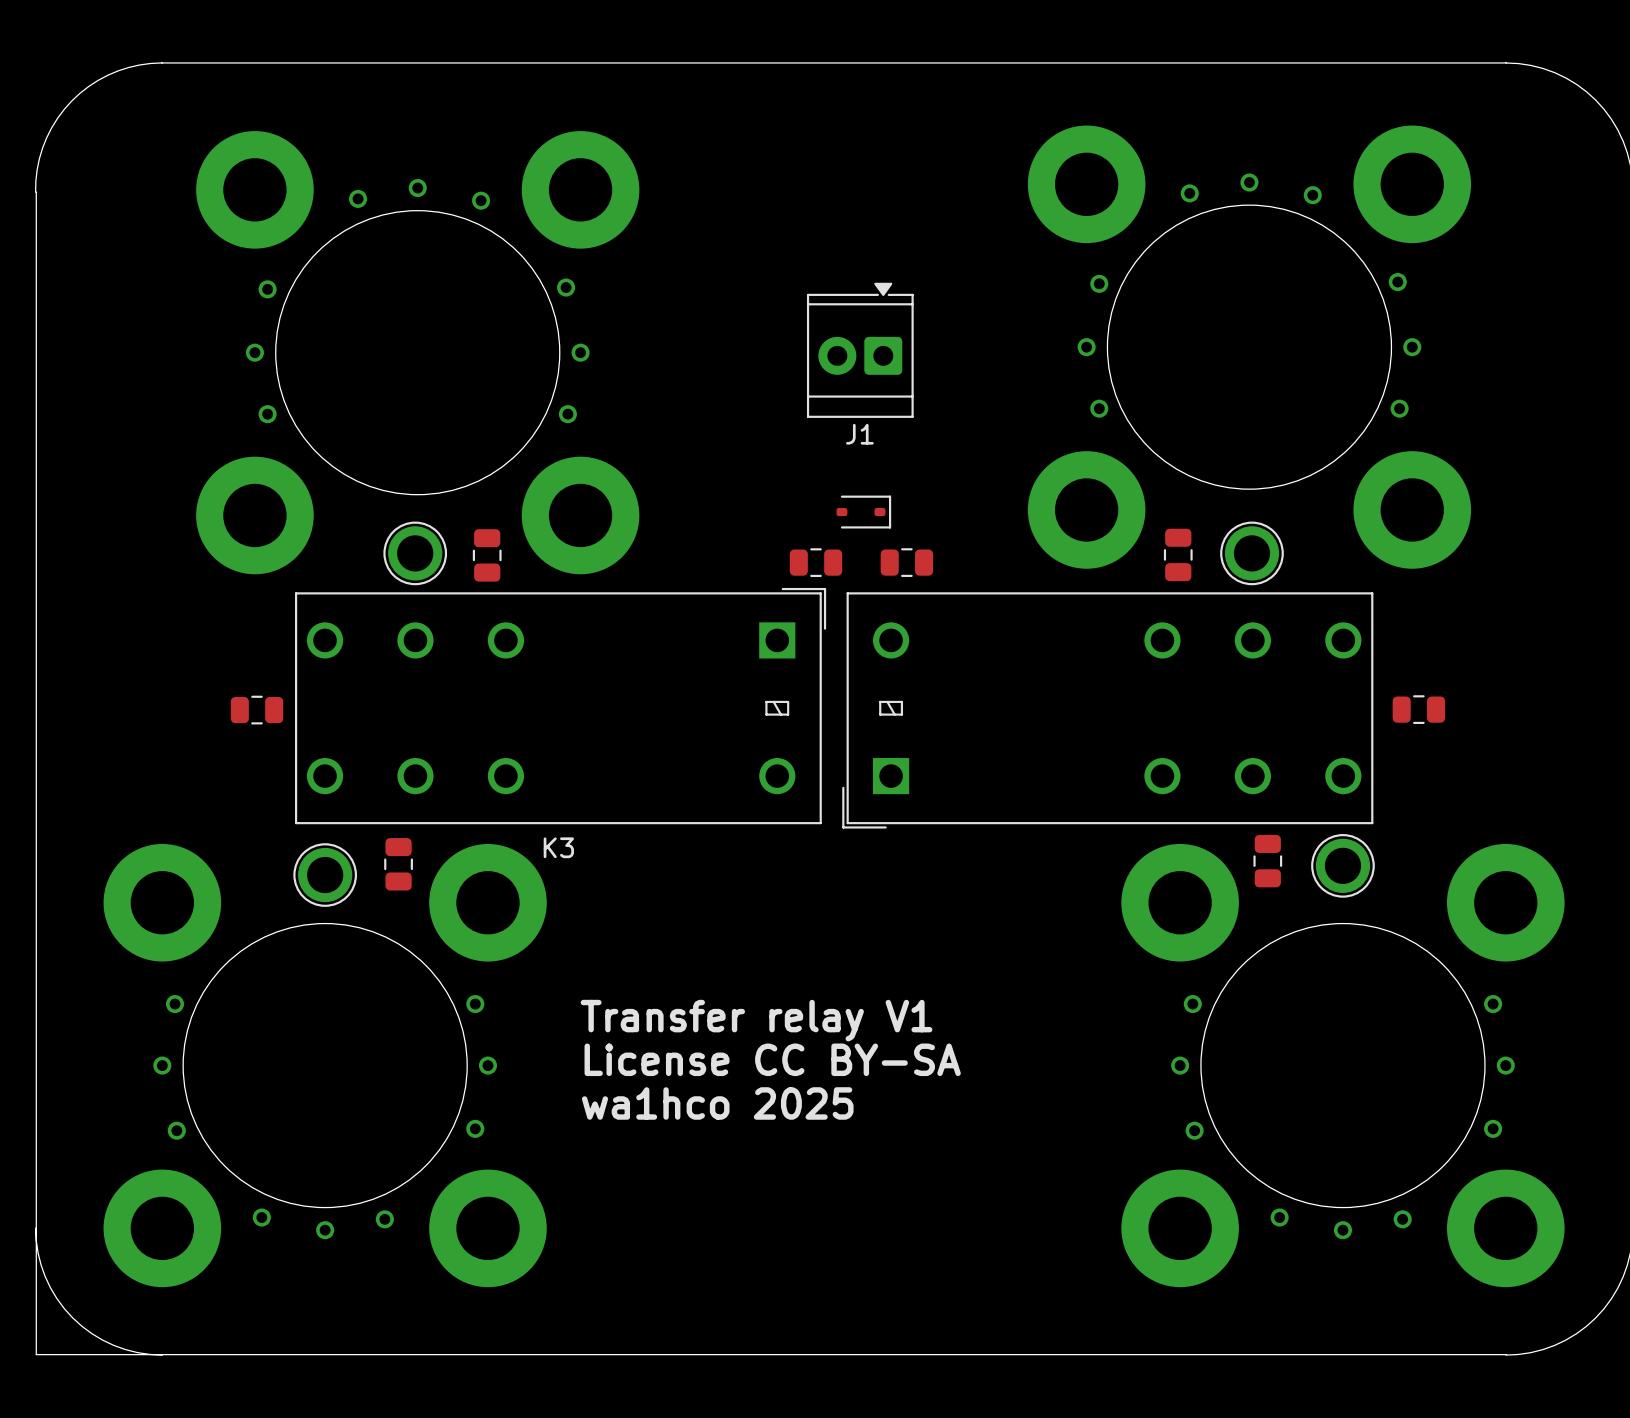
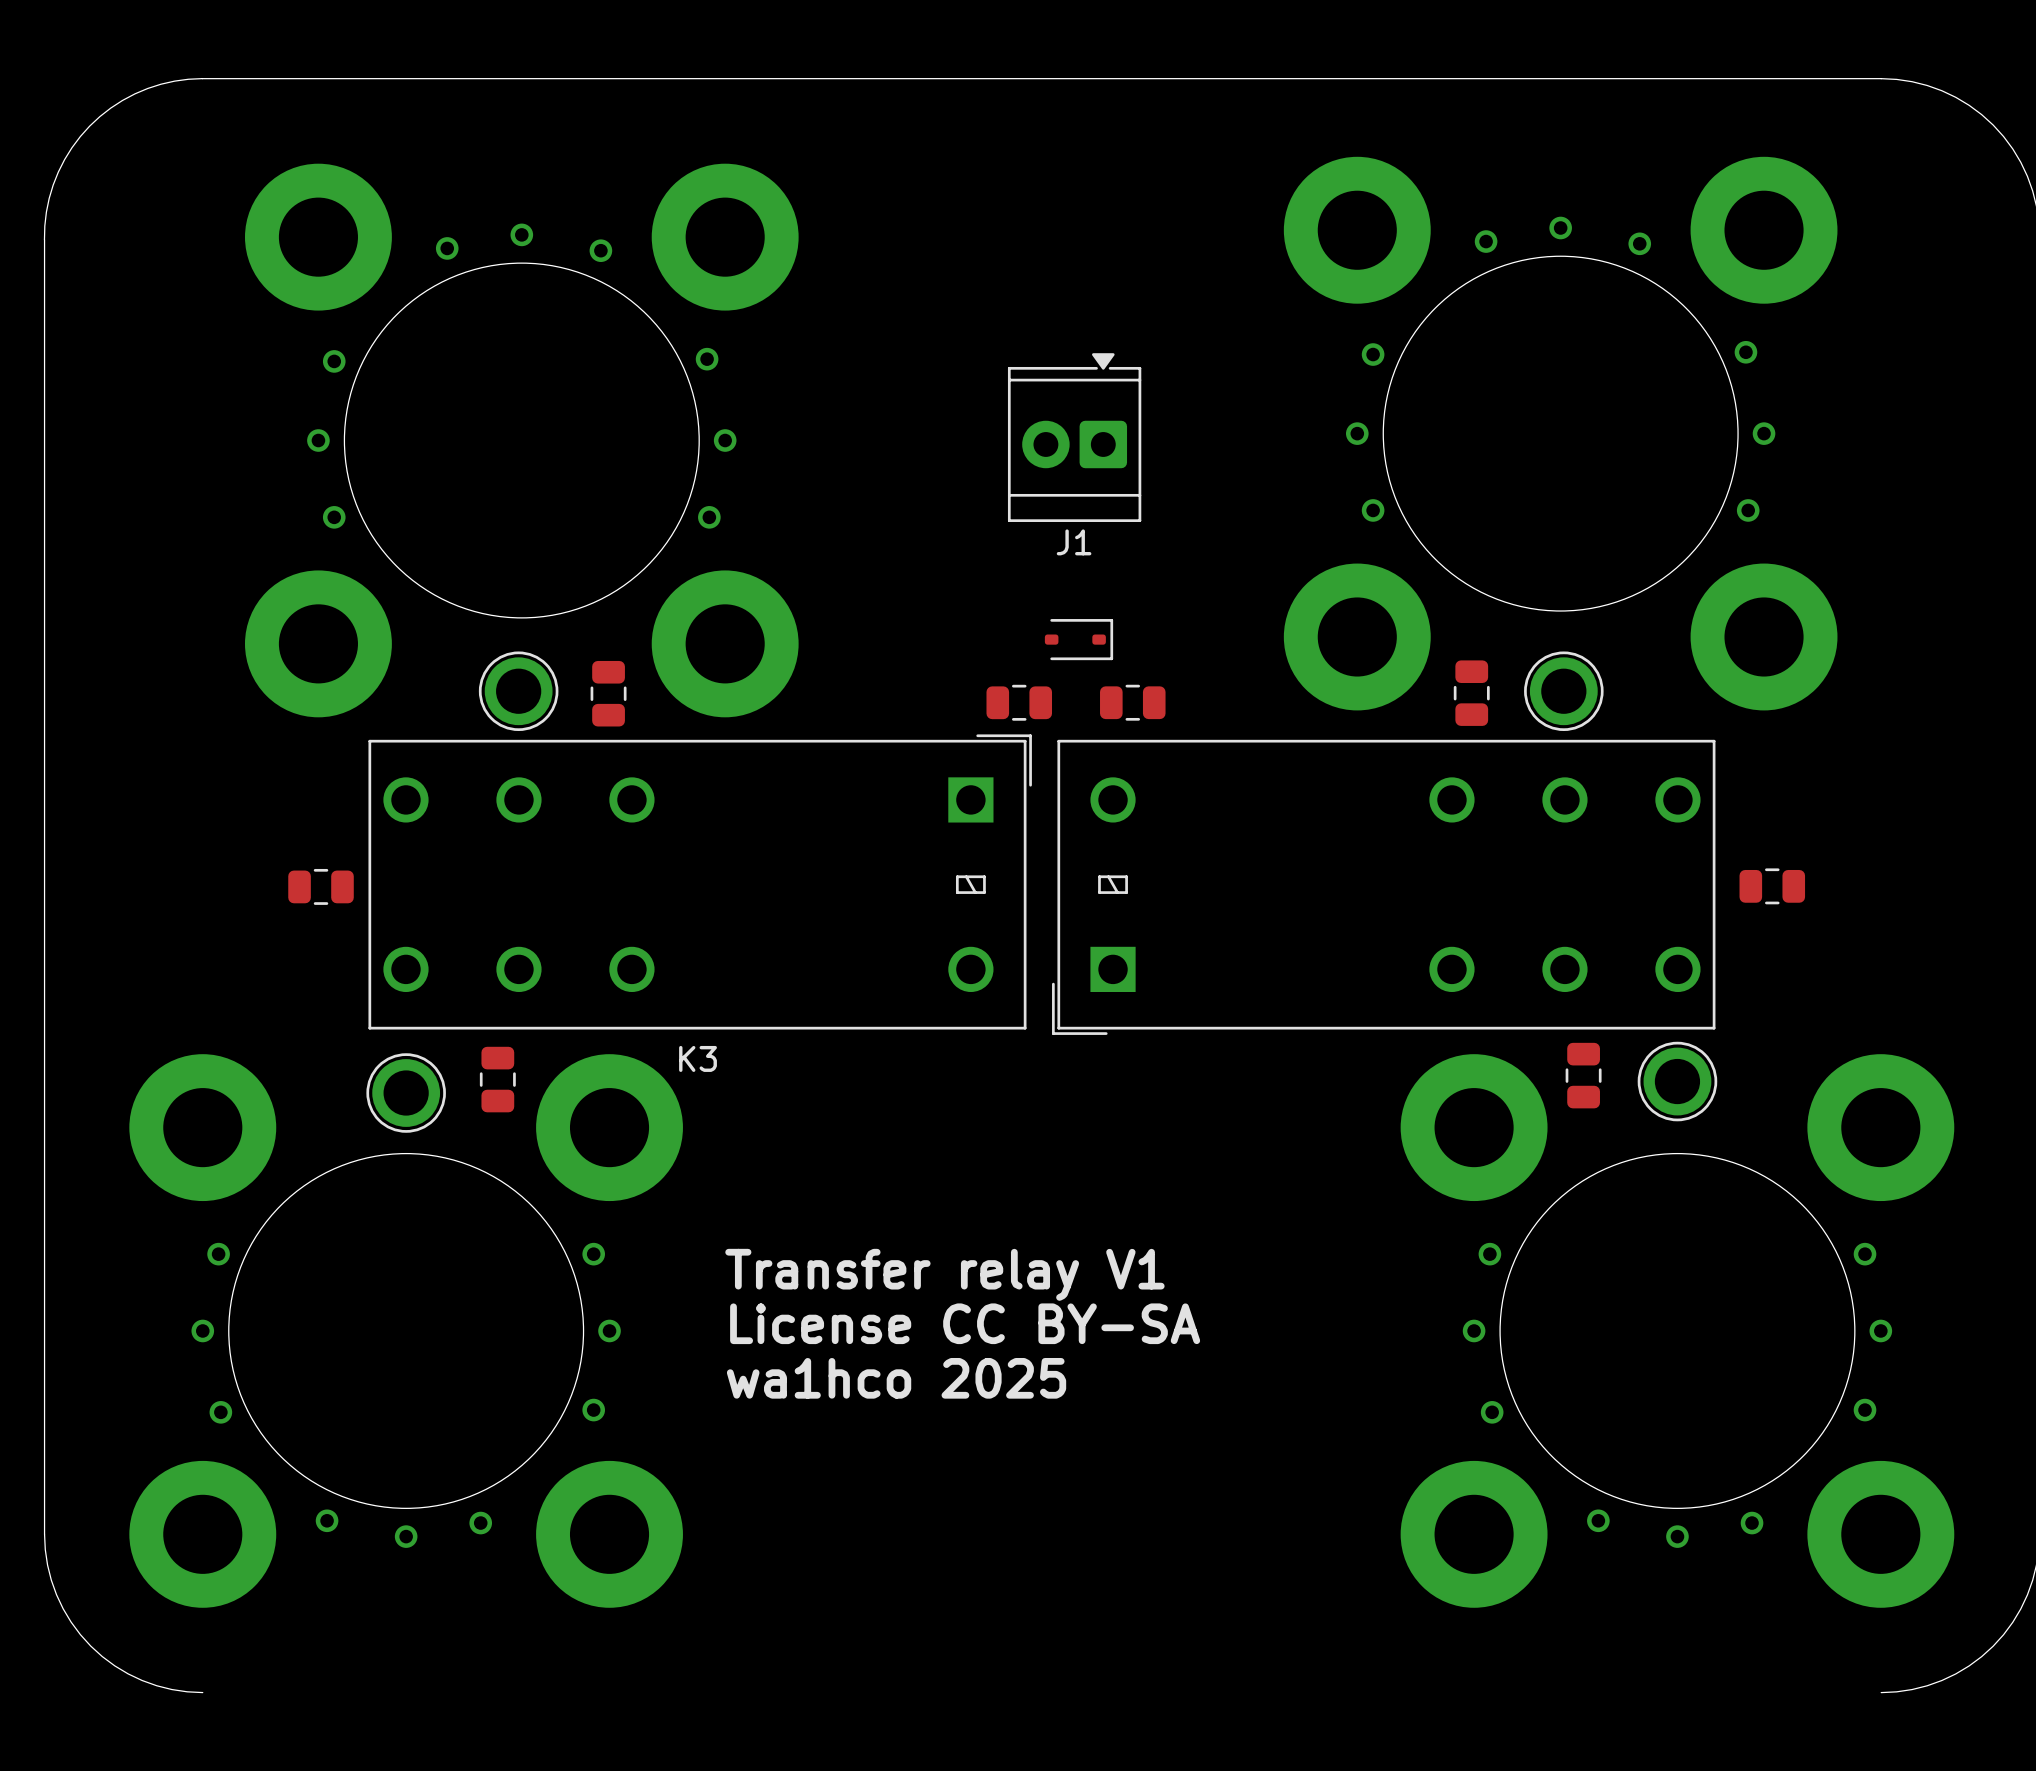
board edge: (36, 192) (36, 1354) (1506, 1354) -> (44, 239) (44, 1534)

